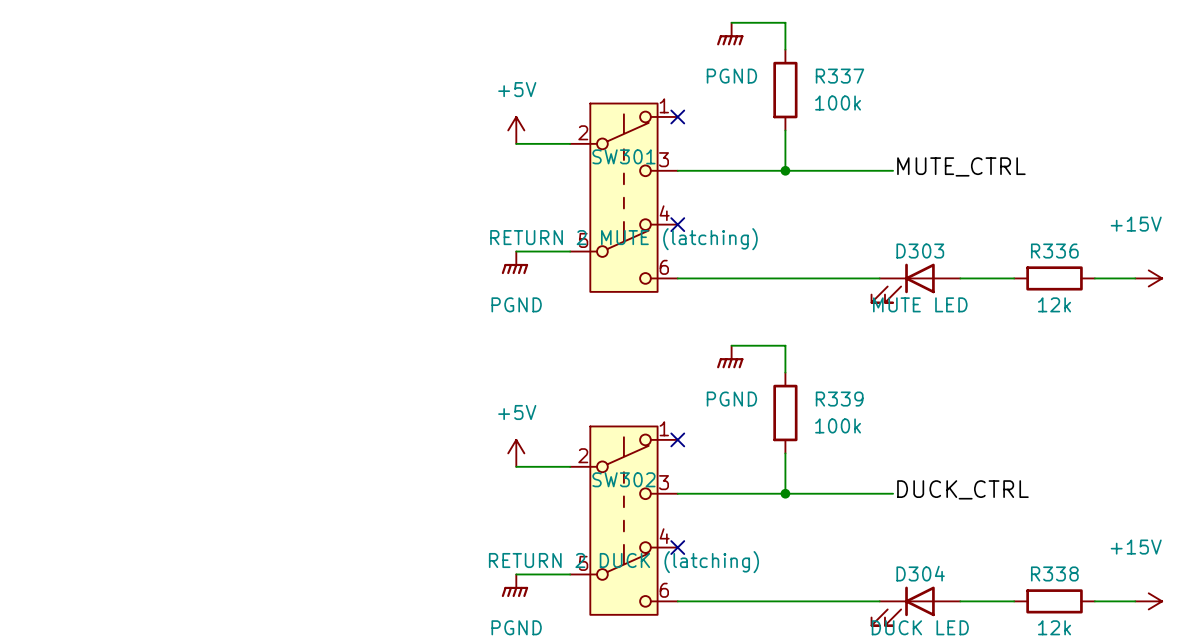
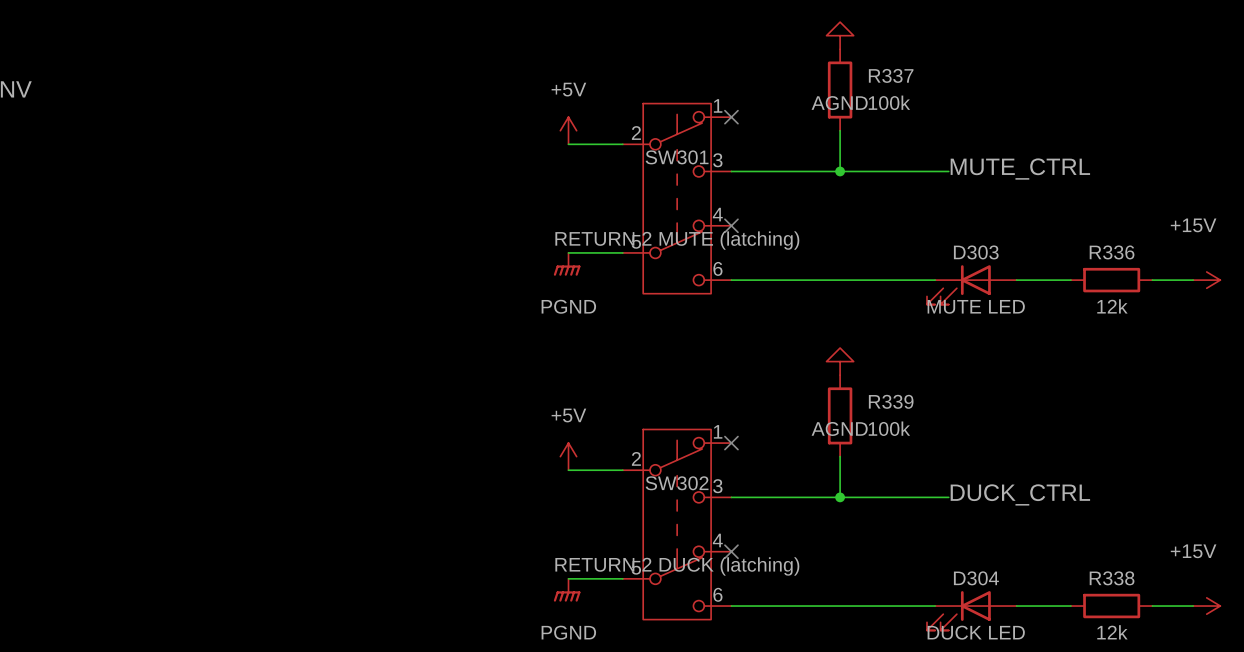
wire: (731, 22) (785, 22) (785, 49) -> none
power symbol: PGND (730, 34) -> none
power symbol: none -> AGND (840, 35)
wire: (731, 345) (785, 345) (785, 372) -> none
power symbol: PGND (730, 357) -> none
power symbol: none -> AGND (840, 361)

